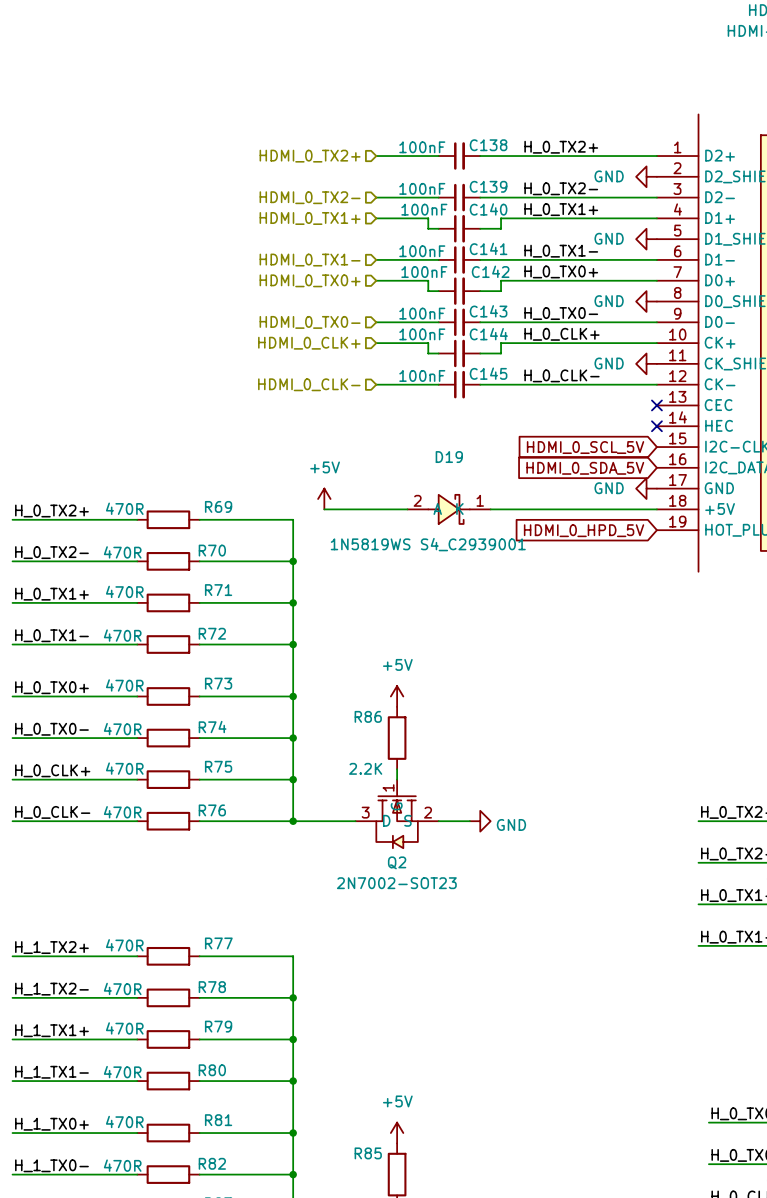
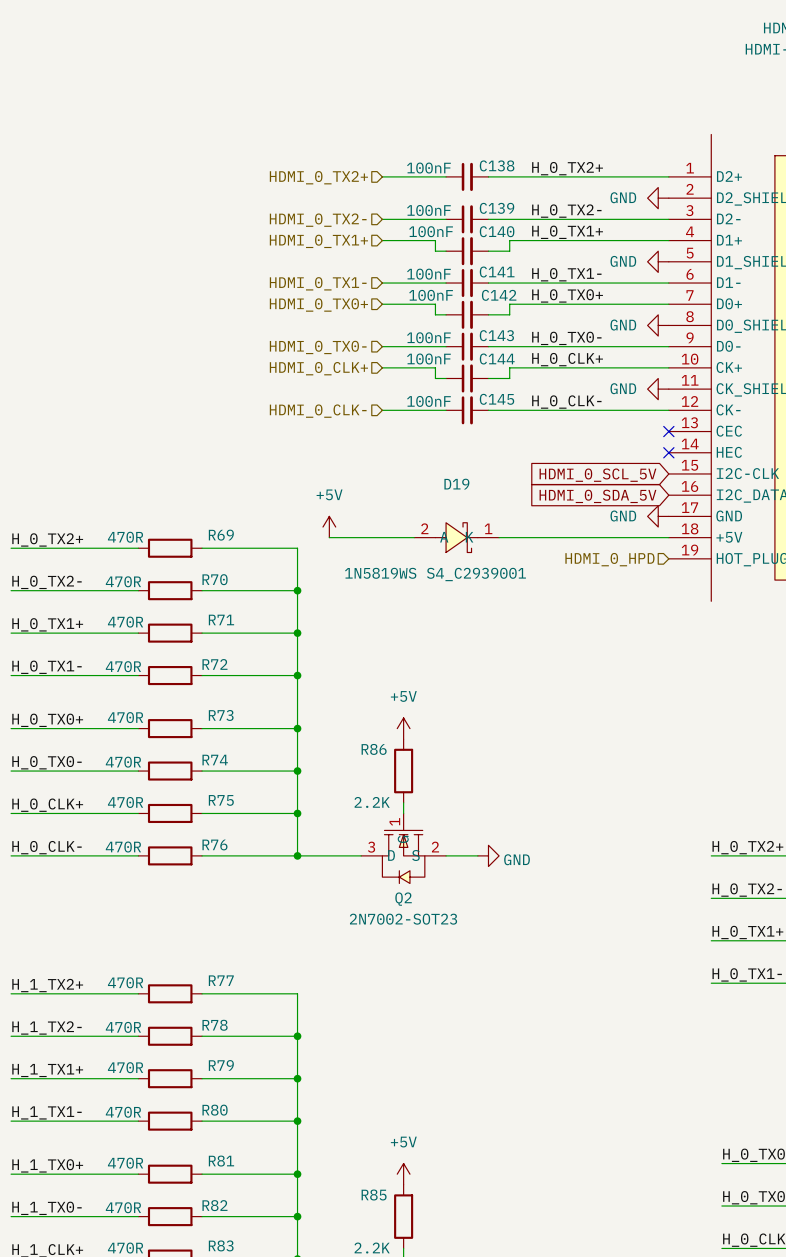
global label: HDMI_0_HPD_5V (584, 530) -> none
hierarchical label: none -> HDMI_0_HPD (609, 559)

